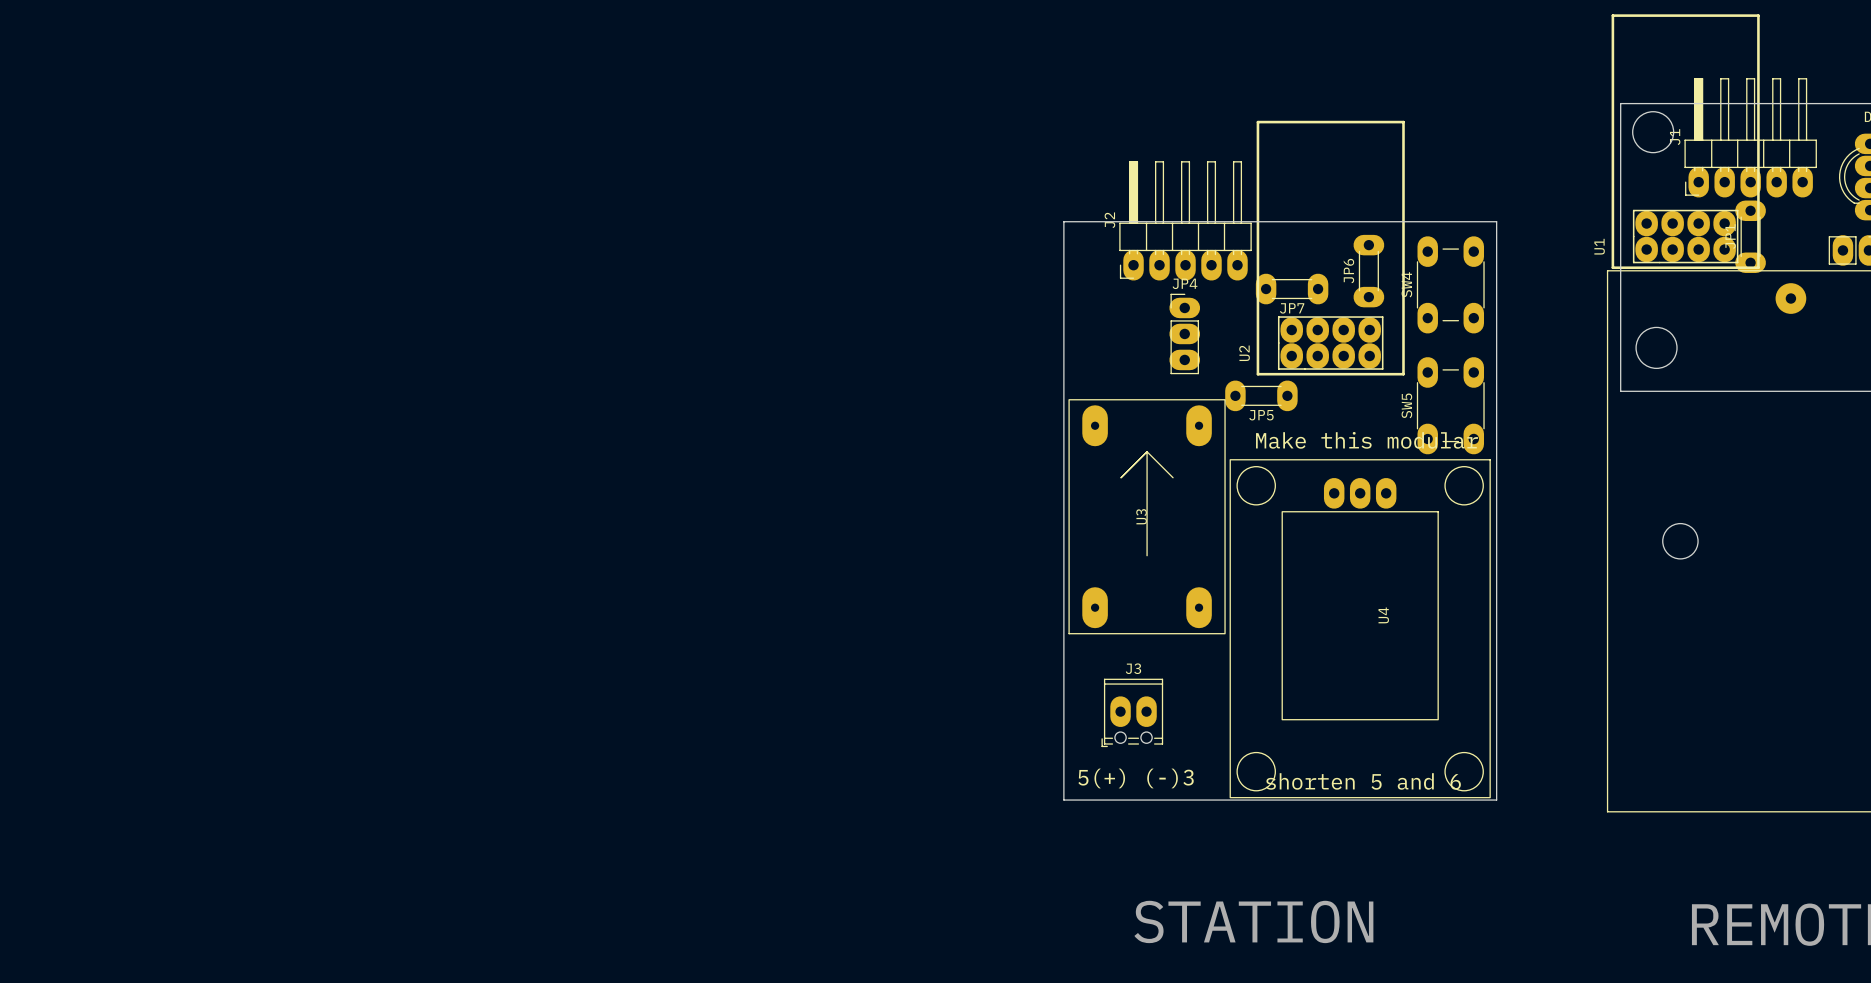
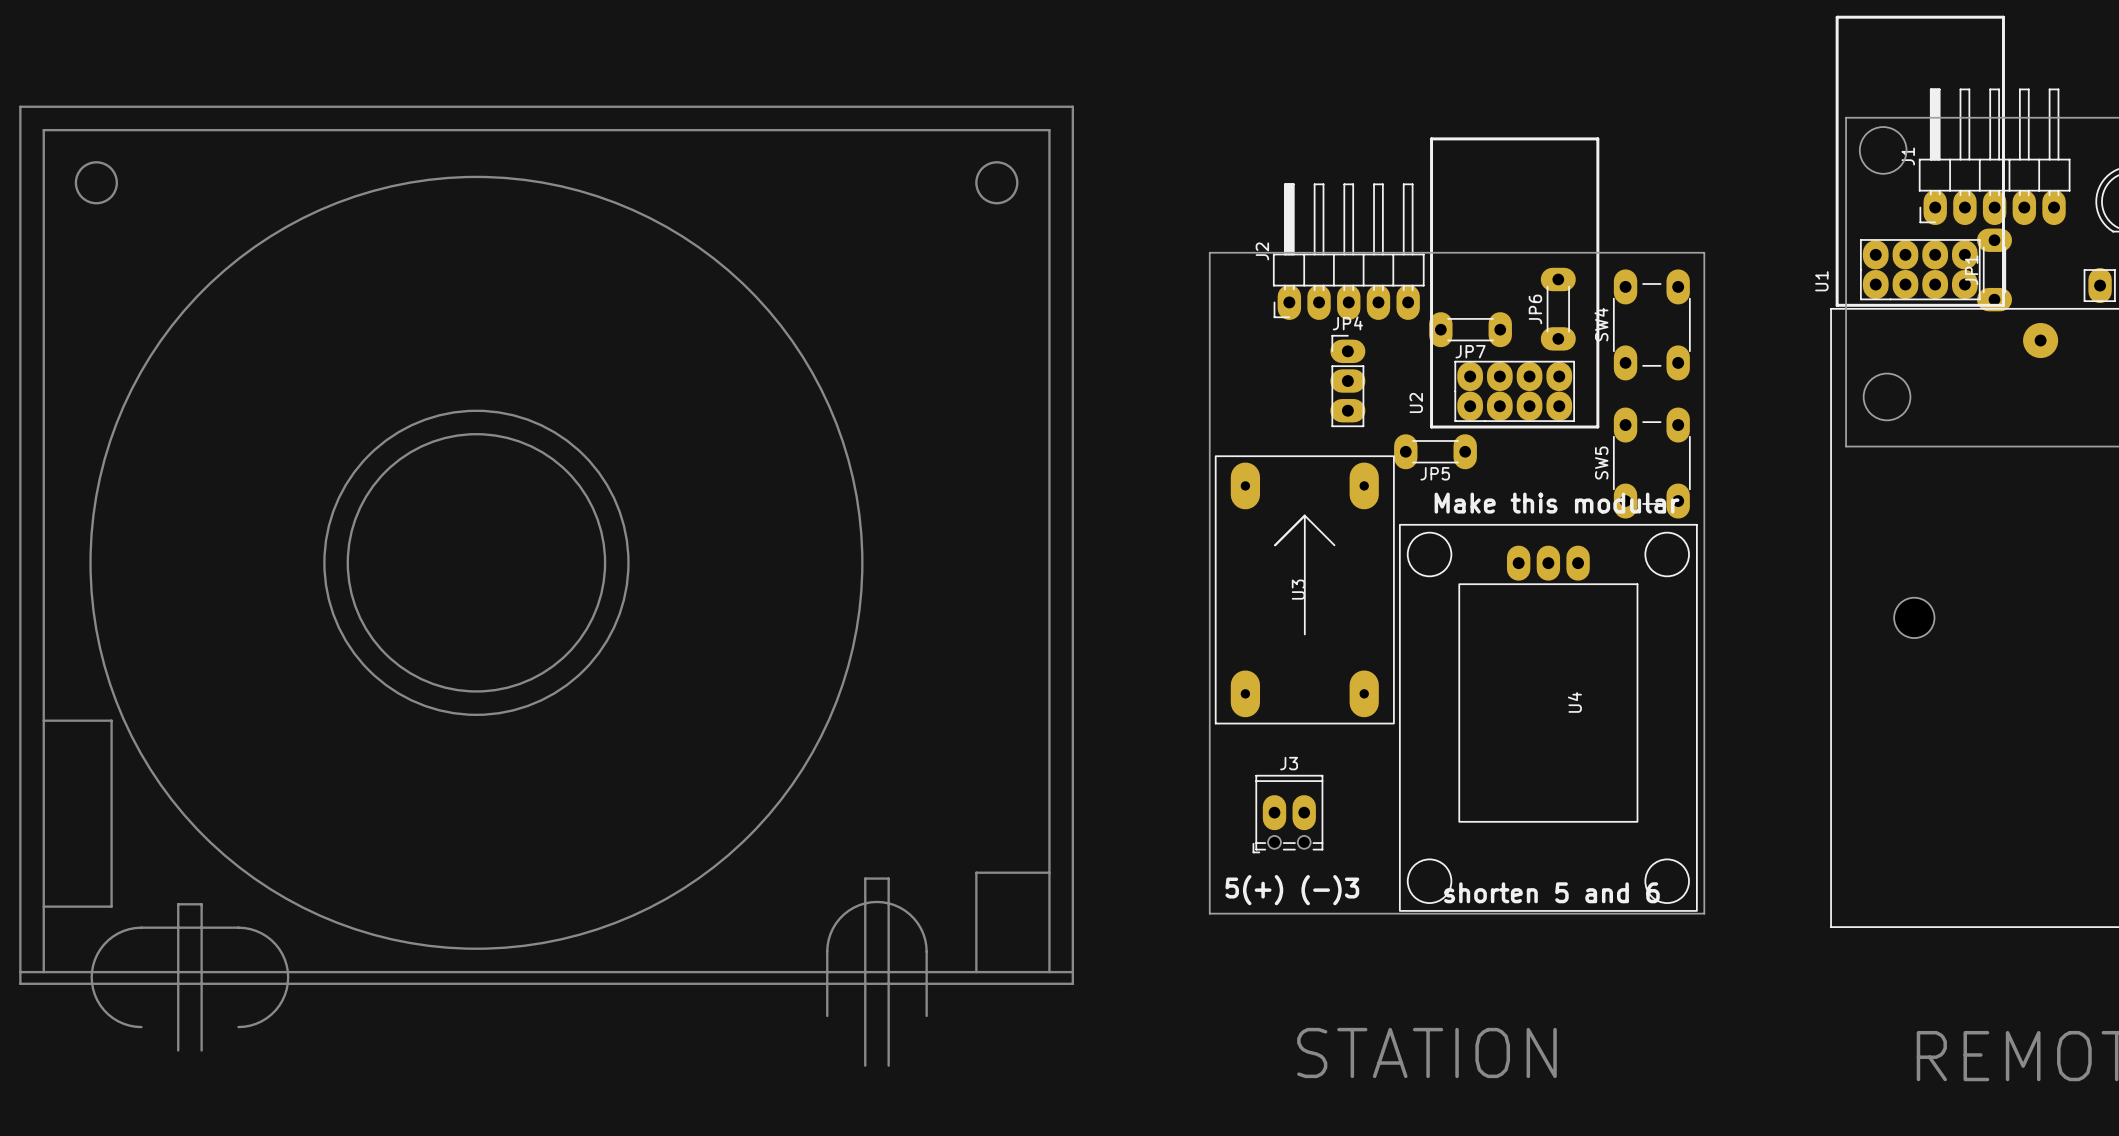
line: none -> (20, 106) (20, 983) (1072, 983) (1072, 106) (20, 106)
drawing: none -> [74, 161, 864, 950]
drawing: none -> [975, 161, 1019, 205]
line: none -> (43, 720) (111, 720) (111, 906) (43, 906)
line: none -> (1049, 872) (976, 872) (976, 972)
line: none -> (20, 972) (1072, 972)
line: none -> (43, 972) (43, 130) (1049, 130) (1049, 972)
line: none -> (827, 1015) (827, 951) (830, 934) (839, 918) (848, 910) (859, 905) (876, 901) (894, 905) (905, 910) (914, 918) (923, 934) (926, 951) (926, 1015)
line: none -> (141, 1027) (123, 1023) (108, 1014) (94, 995) (91, 977) (94, 959) (108, 940) (123, 930) (141, 927) (244, 928) (261, 933) (275, 944) (286, 965) (288, 977) (284, 995) (279, 1005) (266, 1018) (256, 1023) (238, 1027)
line: none -> (178, 1050) (178, 904) (201, 904) (201, 1050)
line: none -> (865, 1065) (865, 878) (888, 878) (888, 1065)

